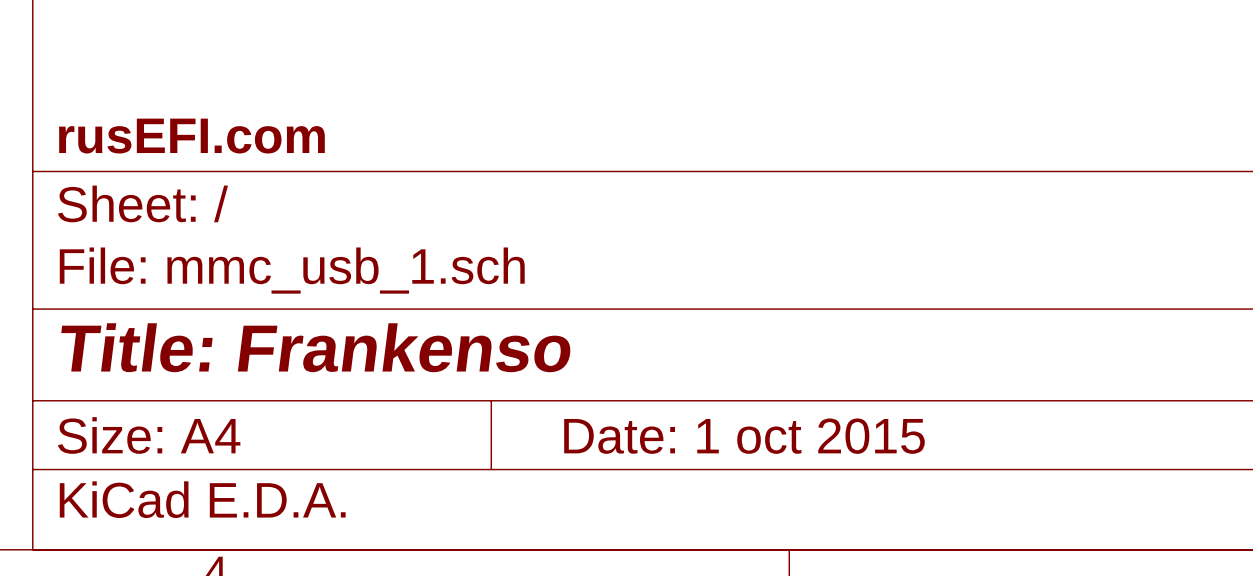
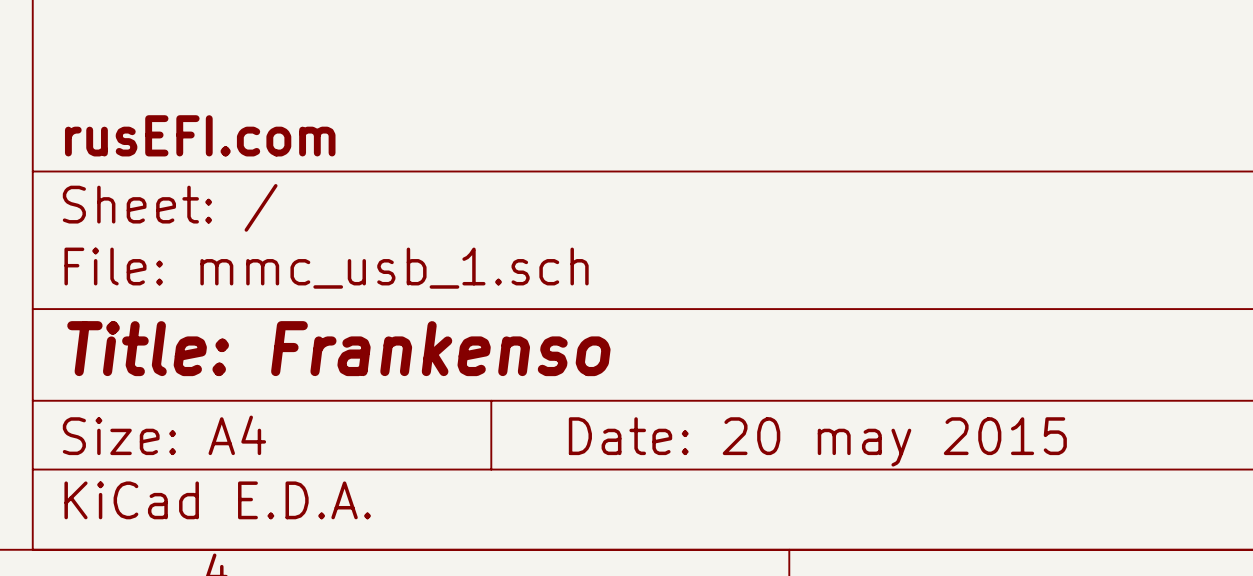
title block: Date: 1 oct 2015 (744, 436) -> Date: 20 may 2015 (817, 441)

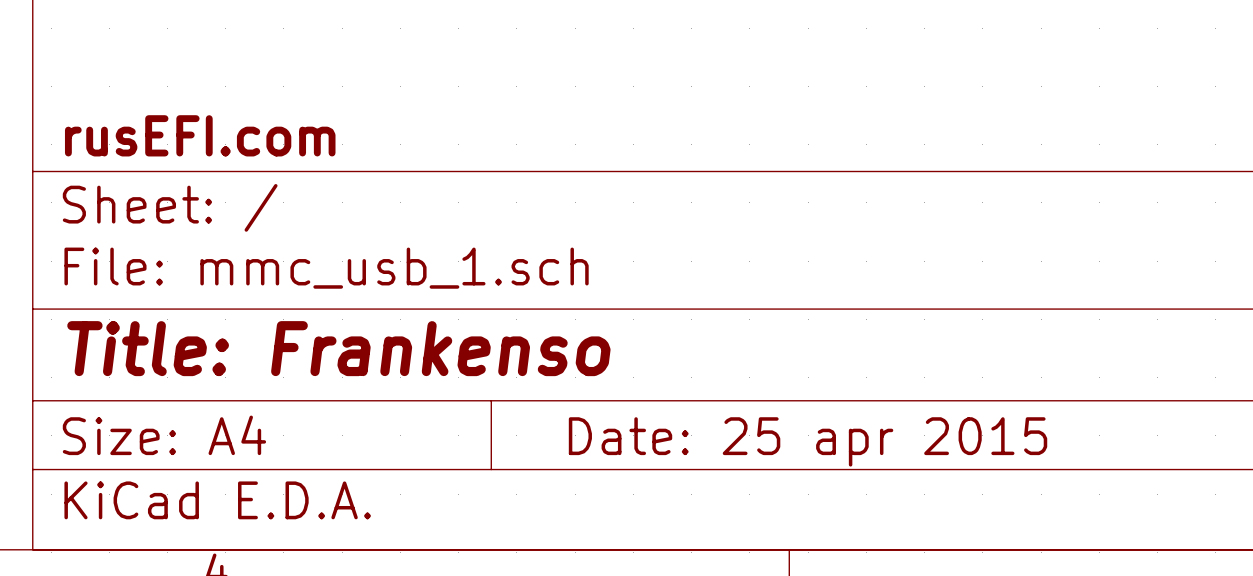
title block: Date: 20 may 2015 (817, 441) -> Date: 25 apr 2015 (808, 441)

